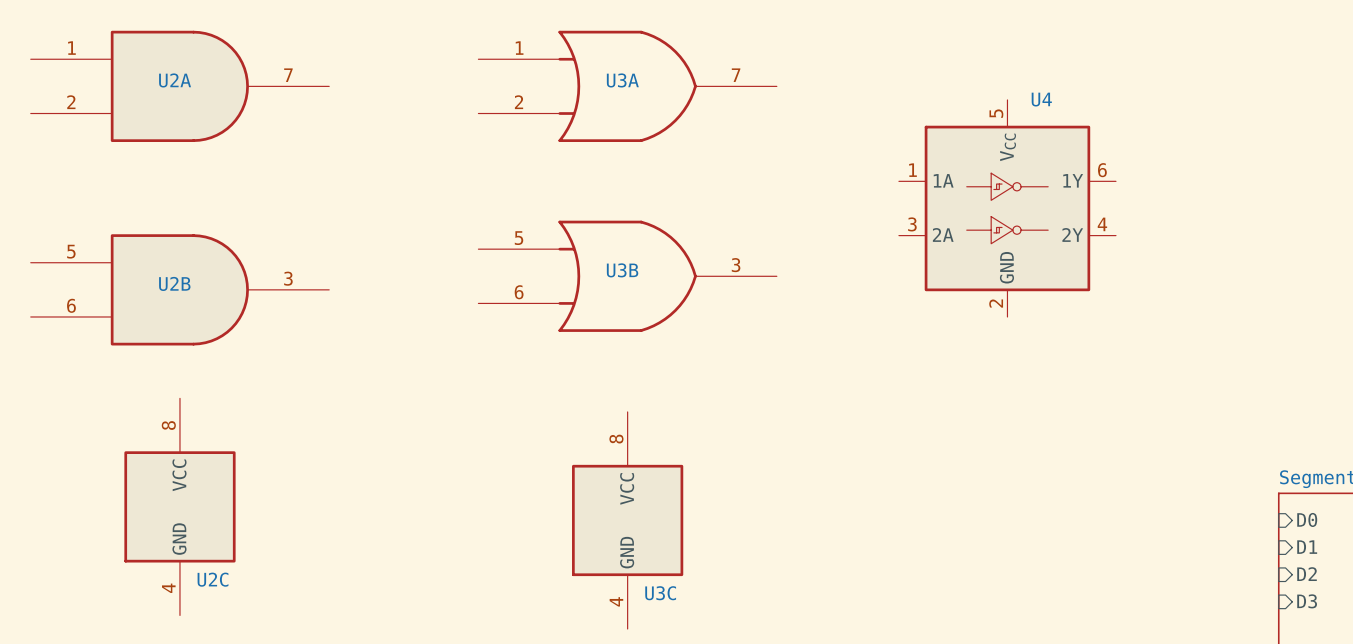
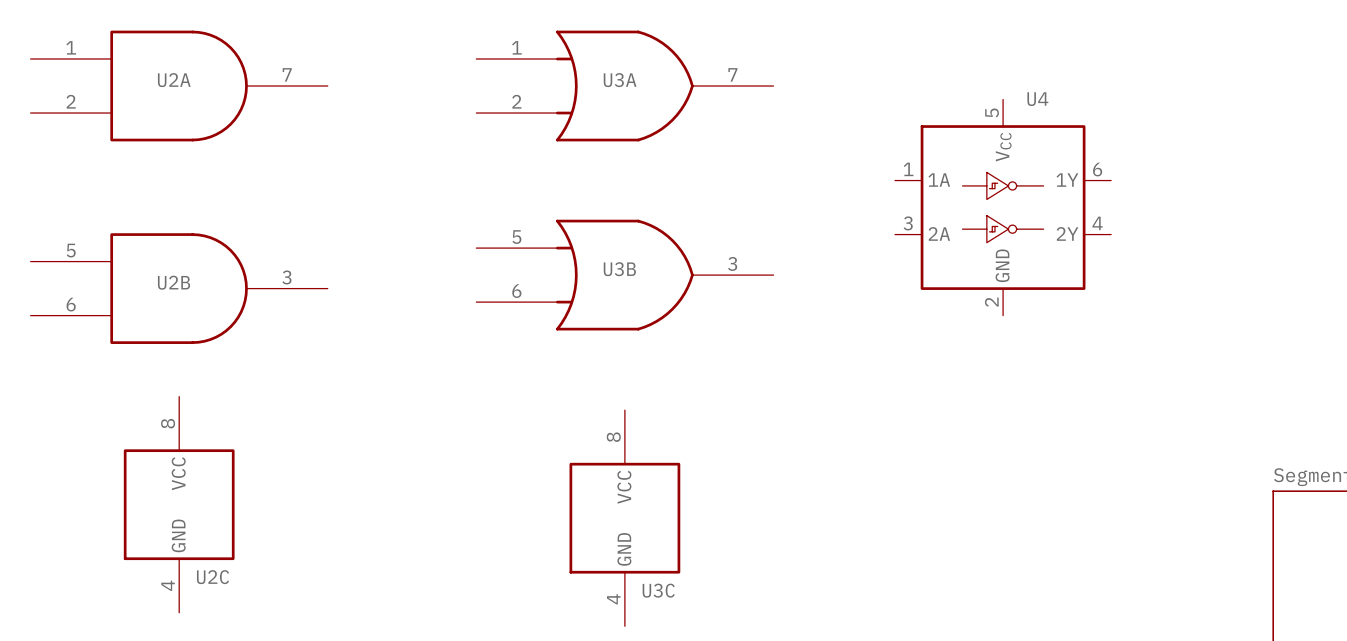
sheet pin: D0 (1307, 519) -> none
sheet pin: D1 (1307, 547) -> none
sheet pin: D2 (1307, 574) -> none
sheet pin: D3 (1307, 601) -> none

